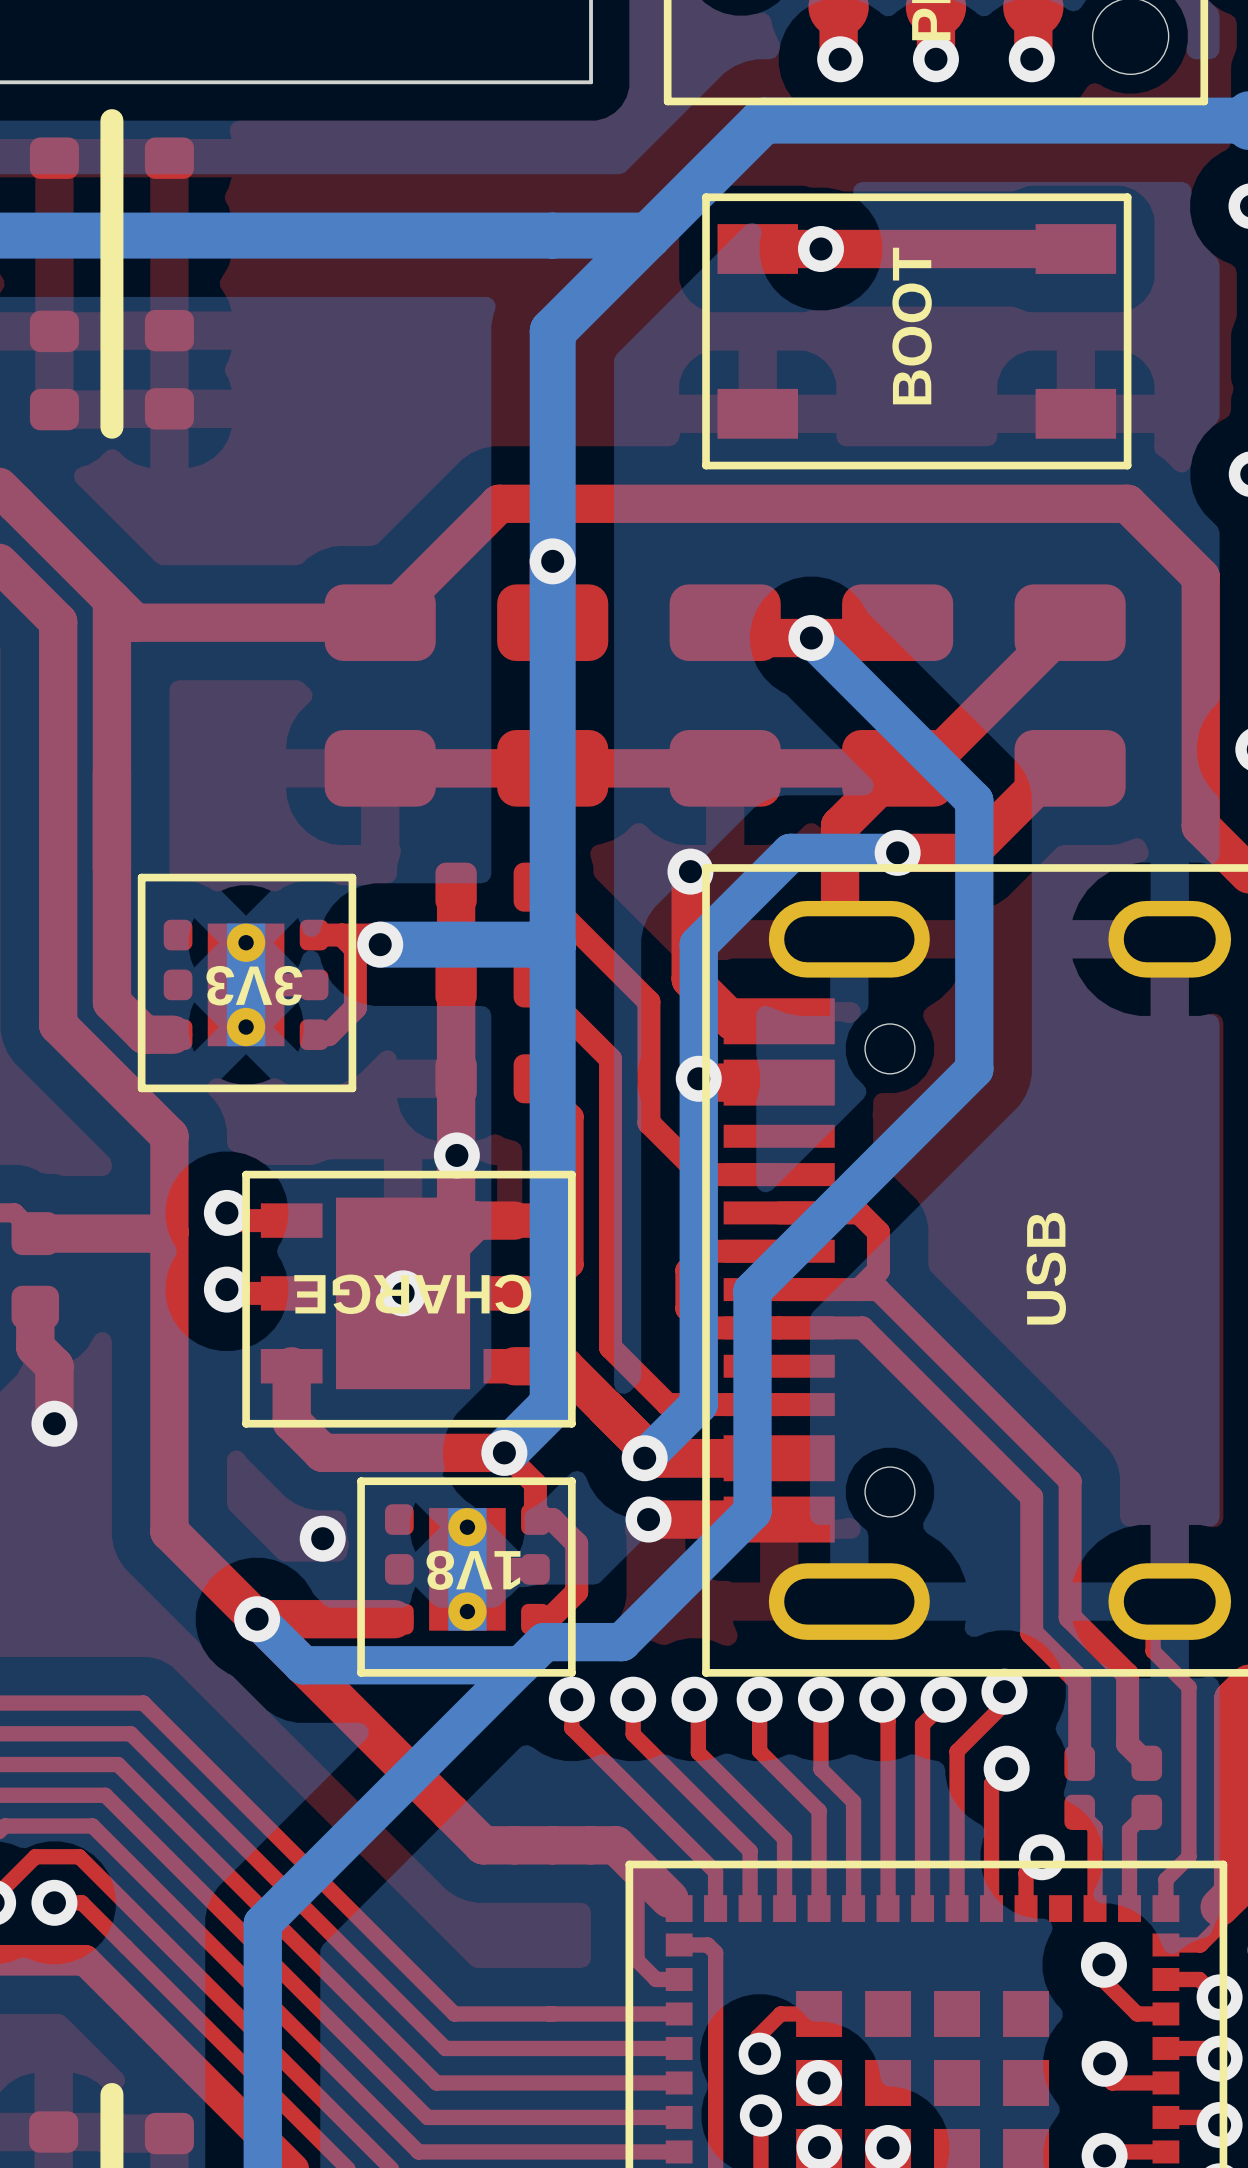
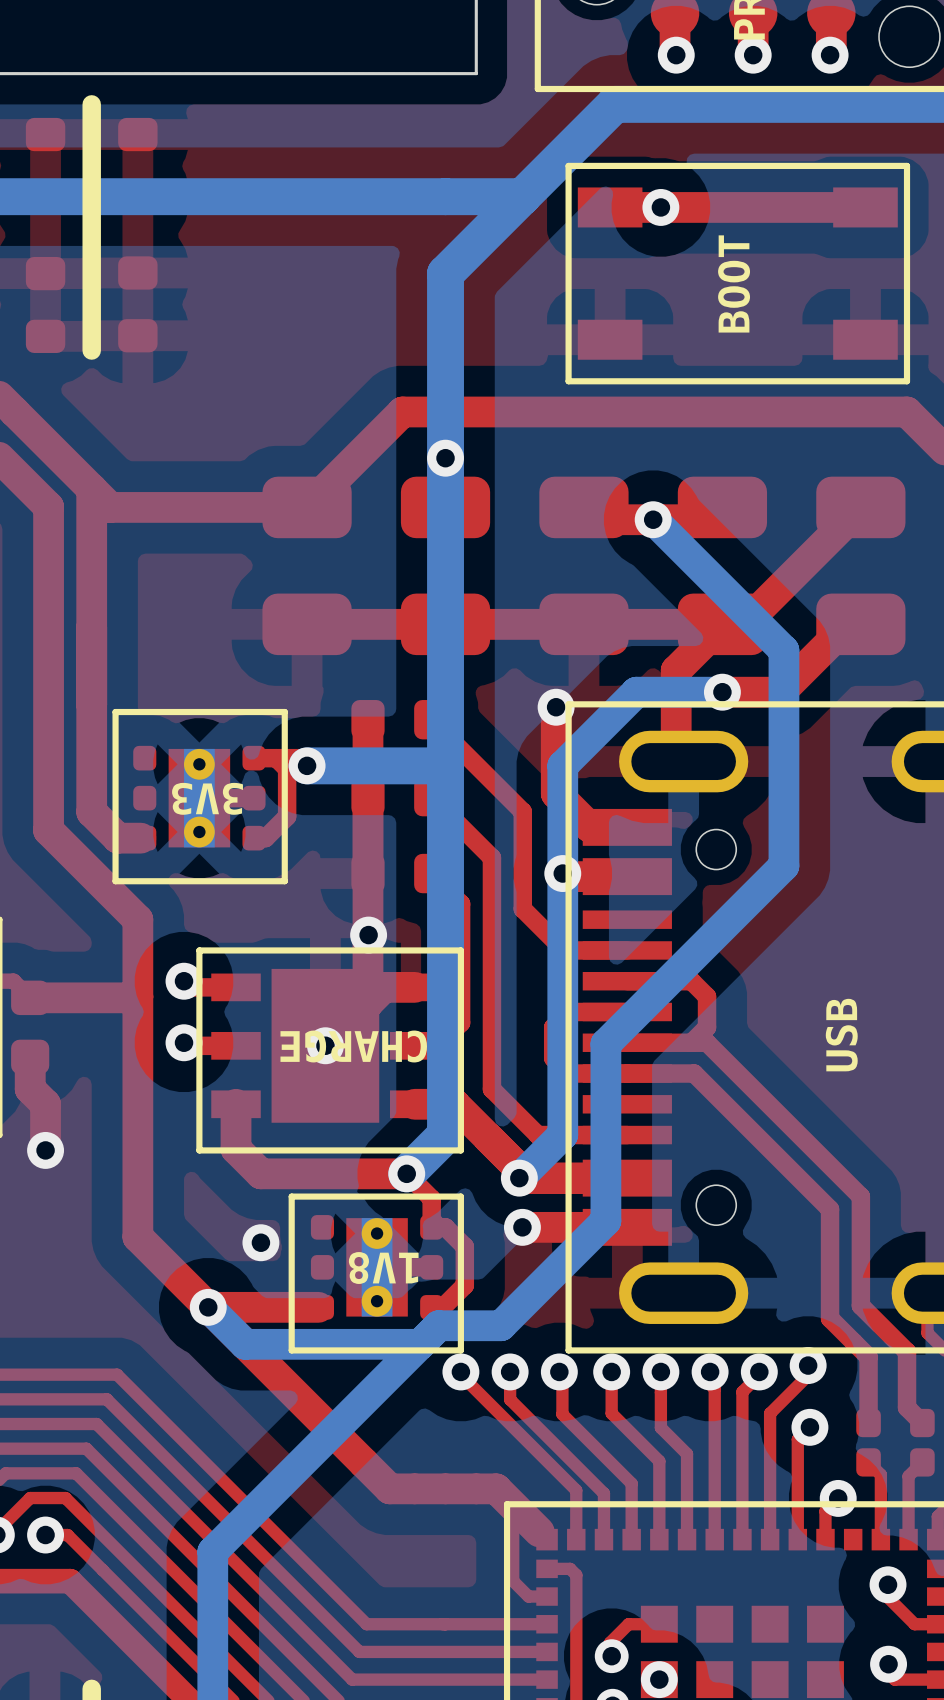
top track: (571, 1703) (571, 1728) (715, 1872) -> (460, 1375) (576, 1490) (576, 1510)

